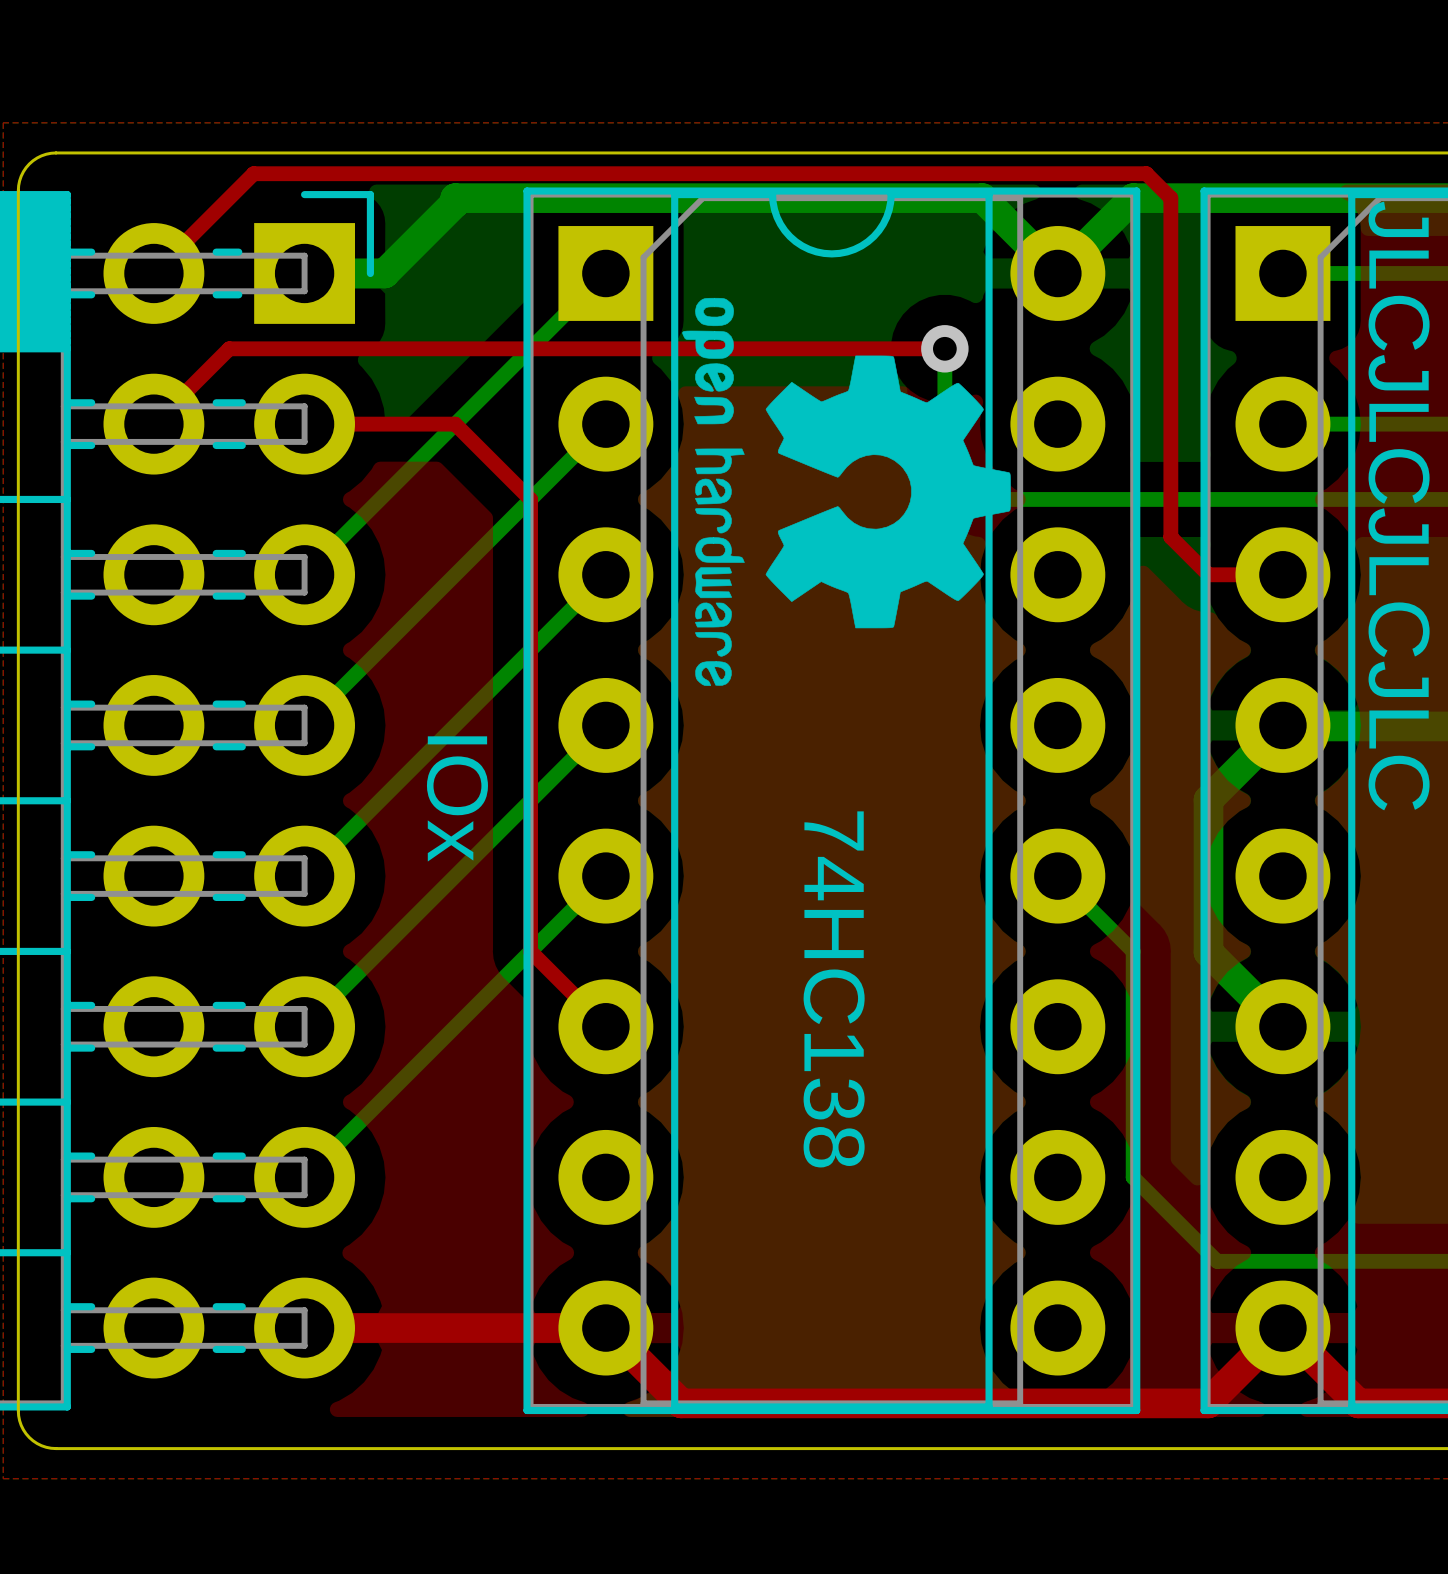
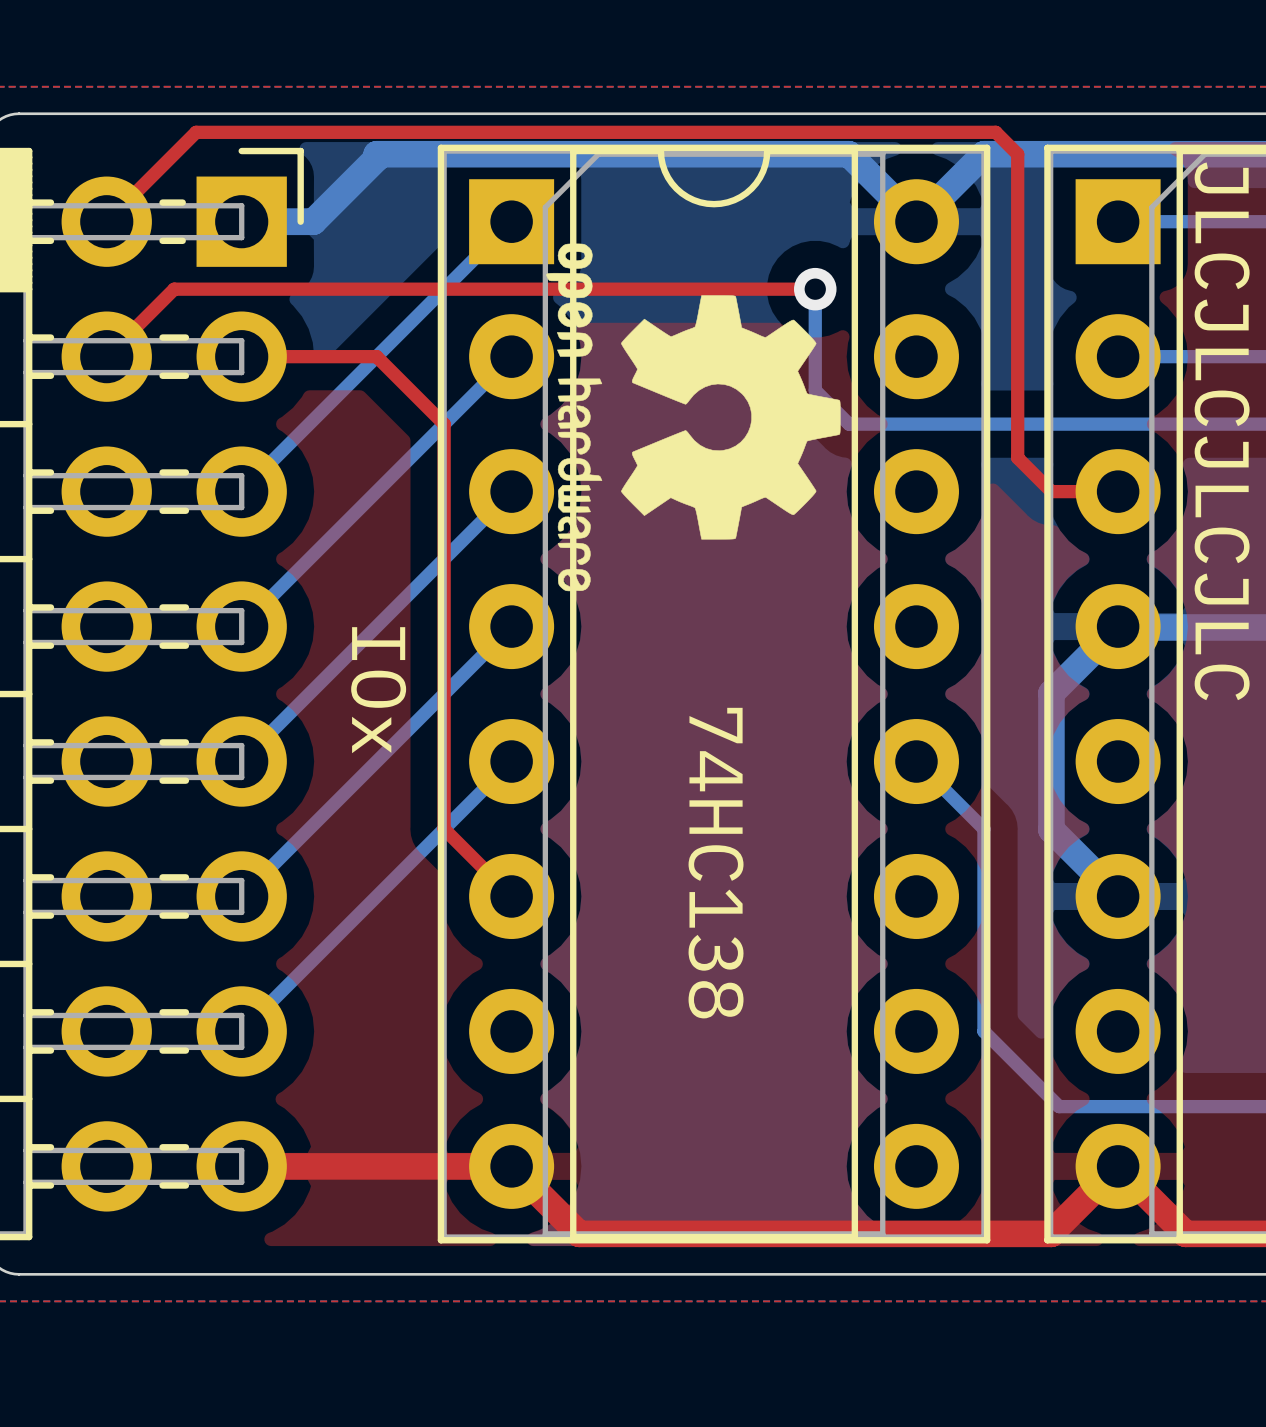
drawing position: (846, 491) -> (693, 417)

